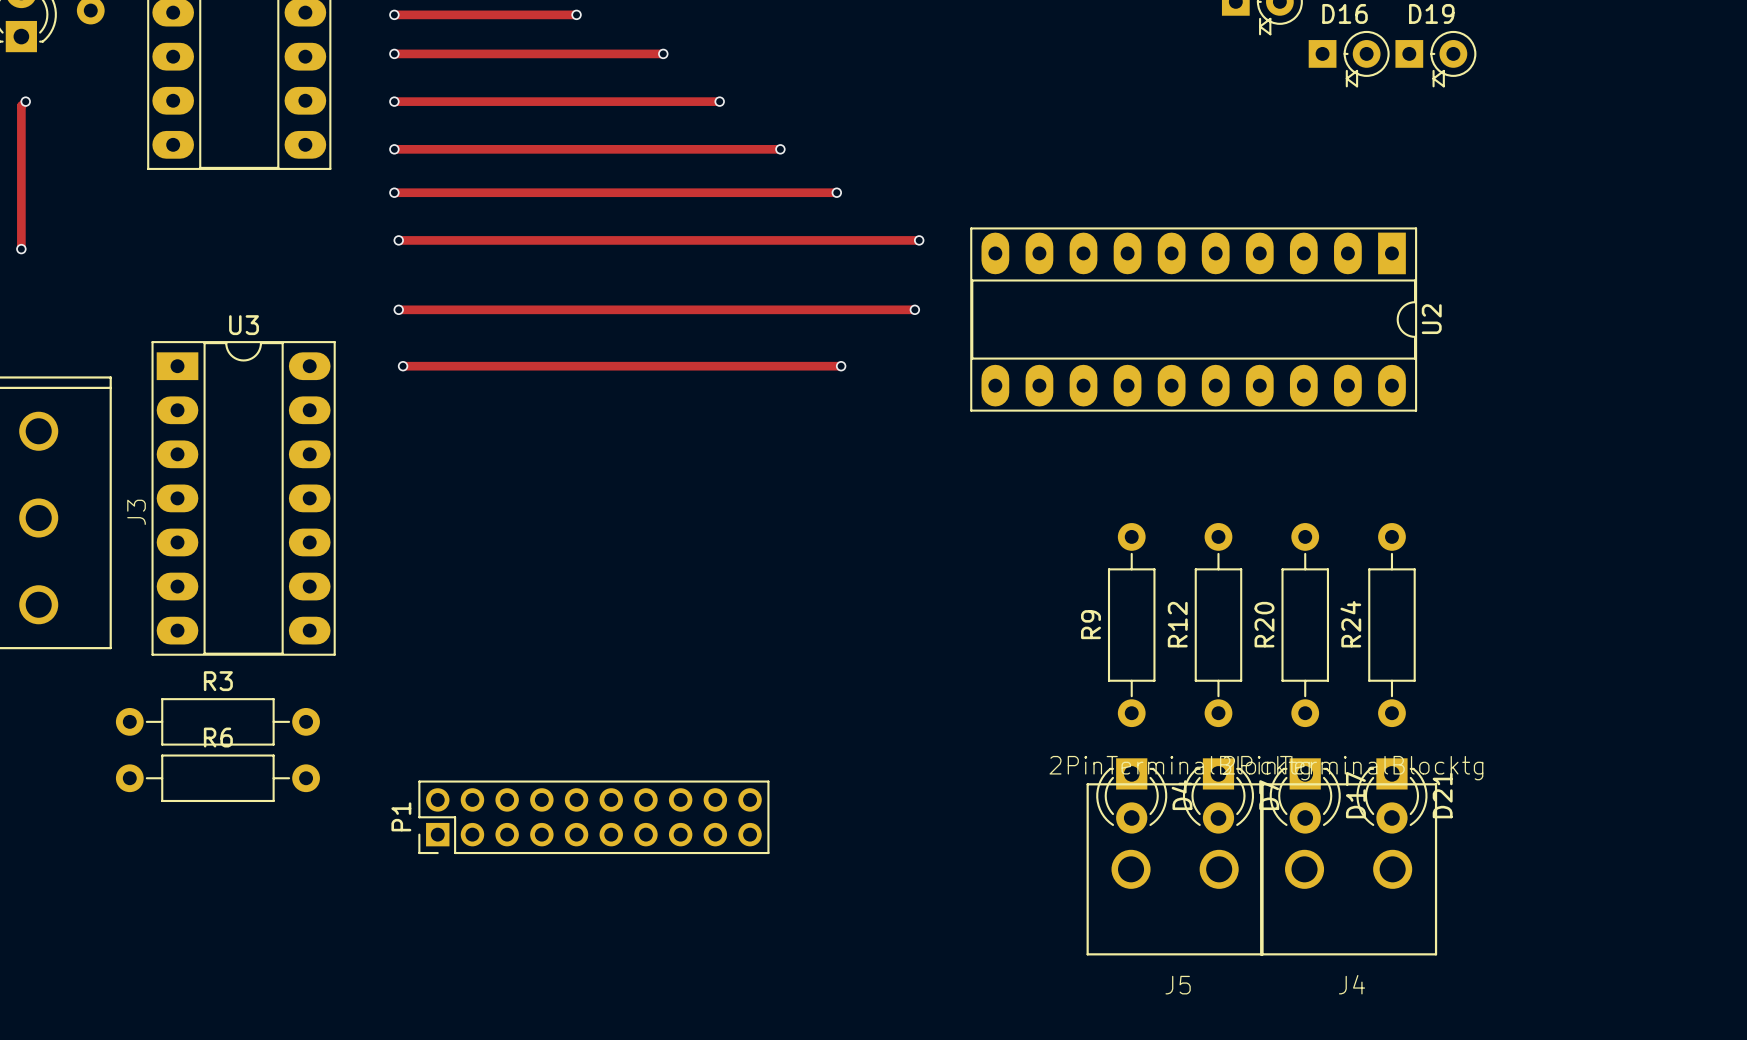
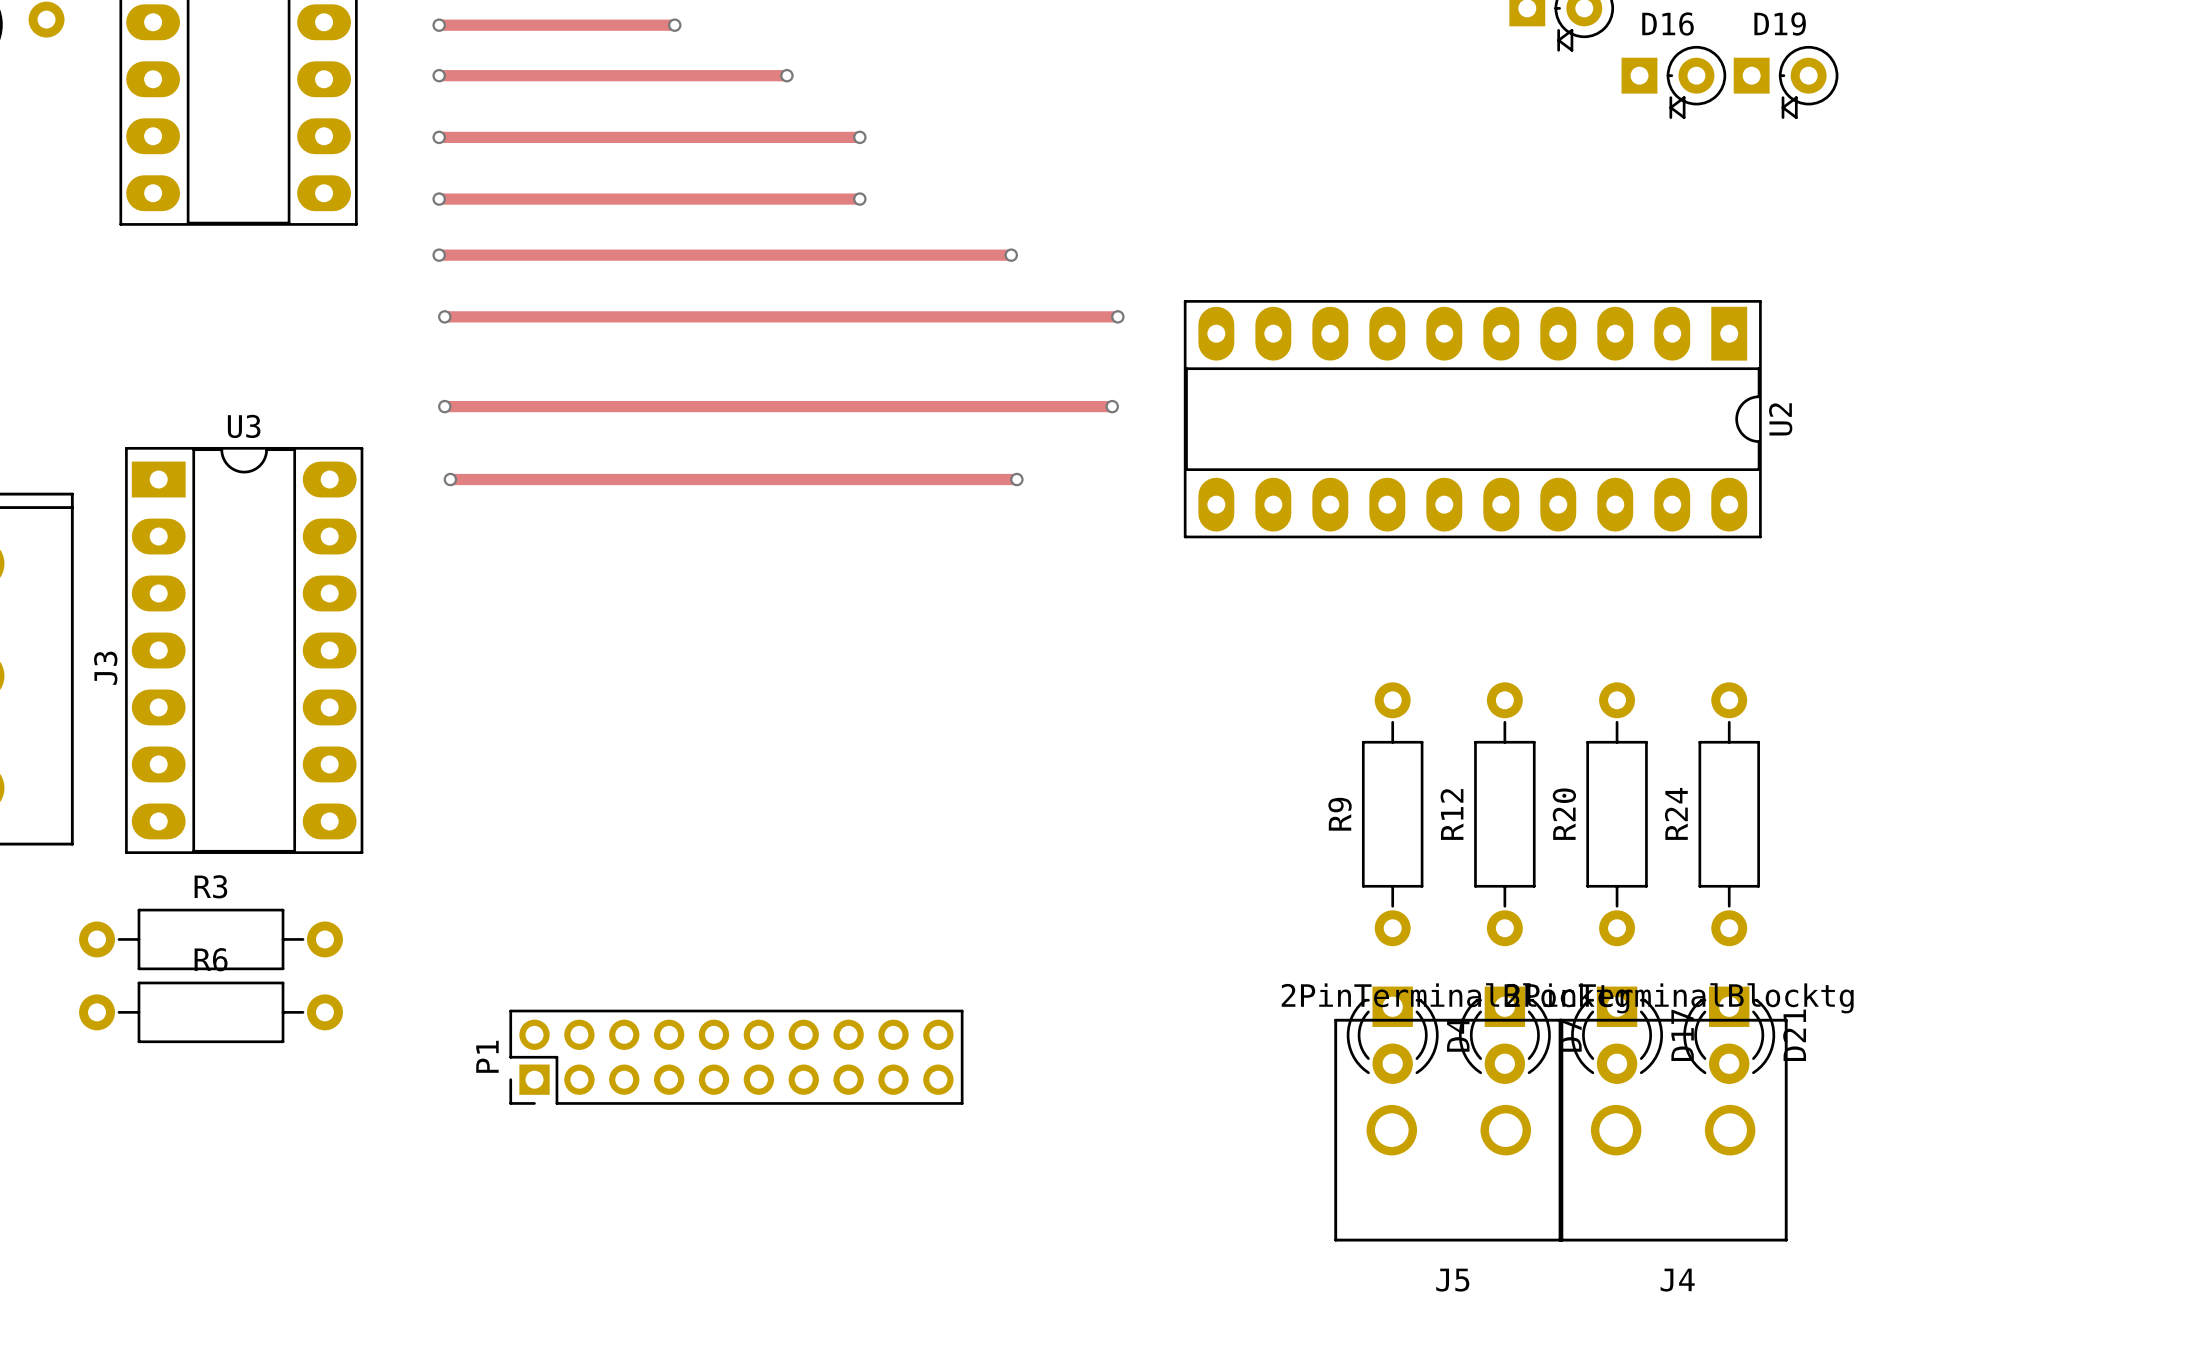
track: (719, 149) (780, 149) -> none
via position: (780, 149) -> (859, 199)
P1 position: (593, 817) -> (736, 1057)

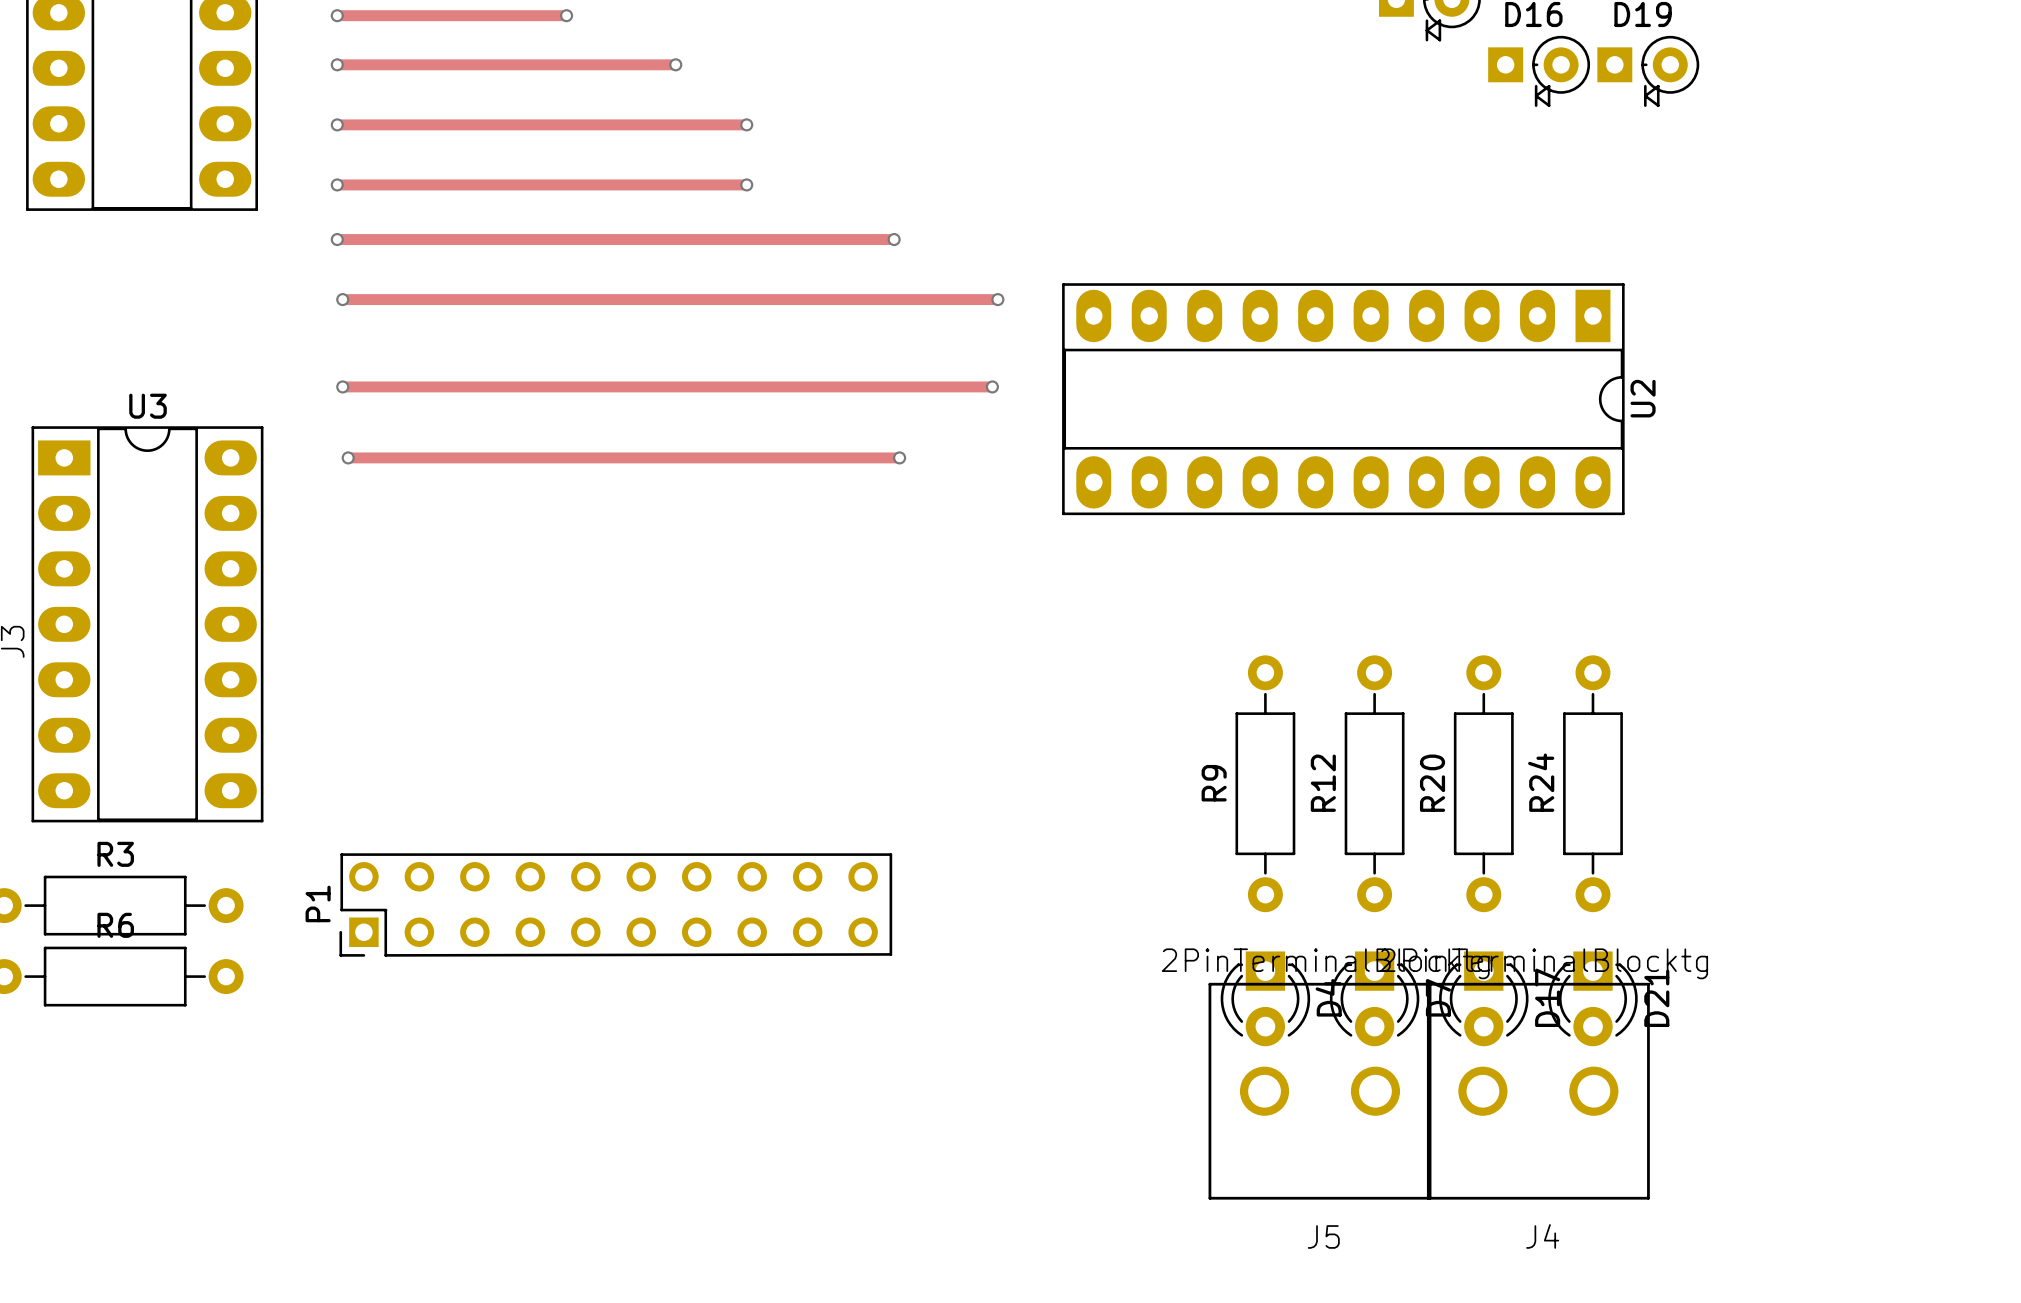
P1 footprint: [509, 1009, 964, 1105] -> [339, 853, 893, 957]
P1 name position: P1 (487, 1056) -> P1 (318, 903)

